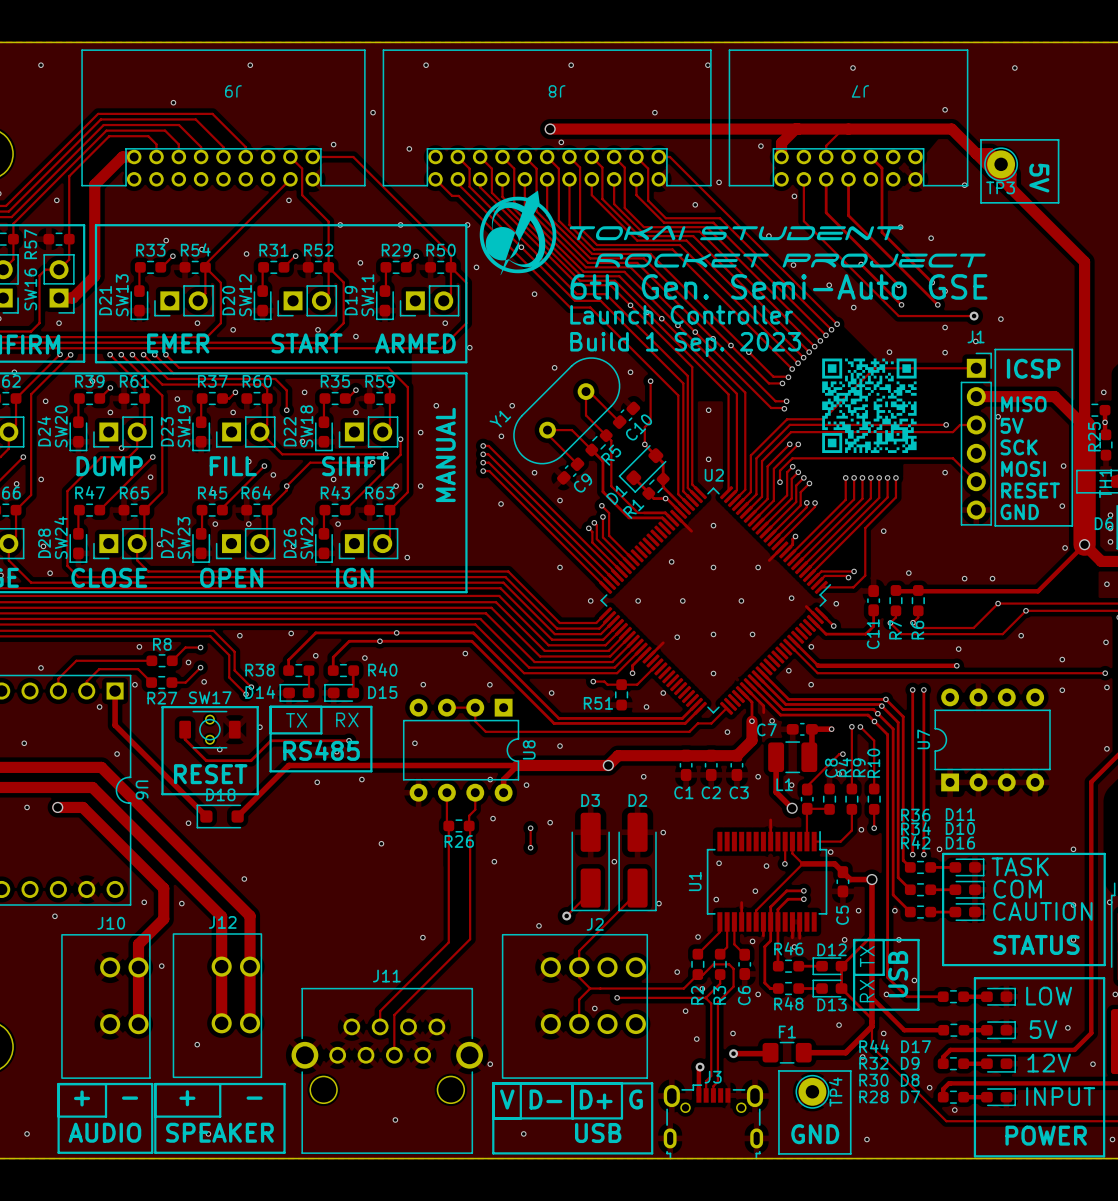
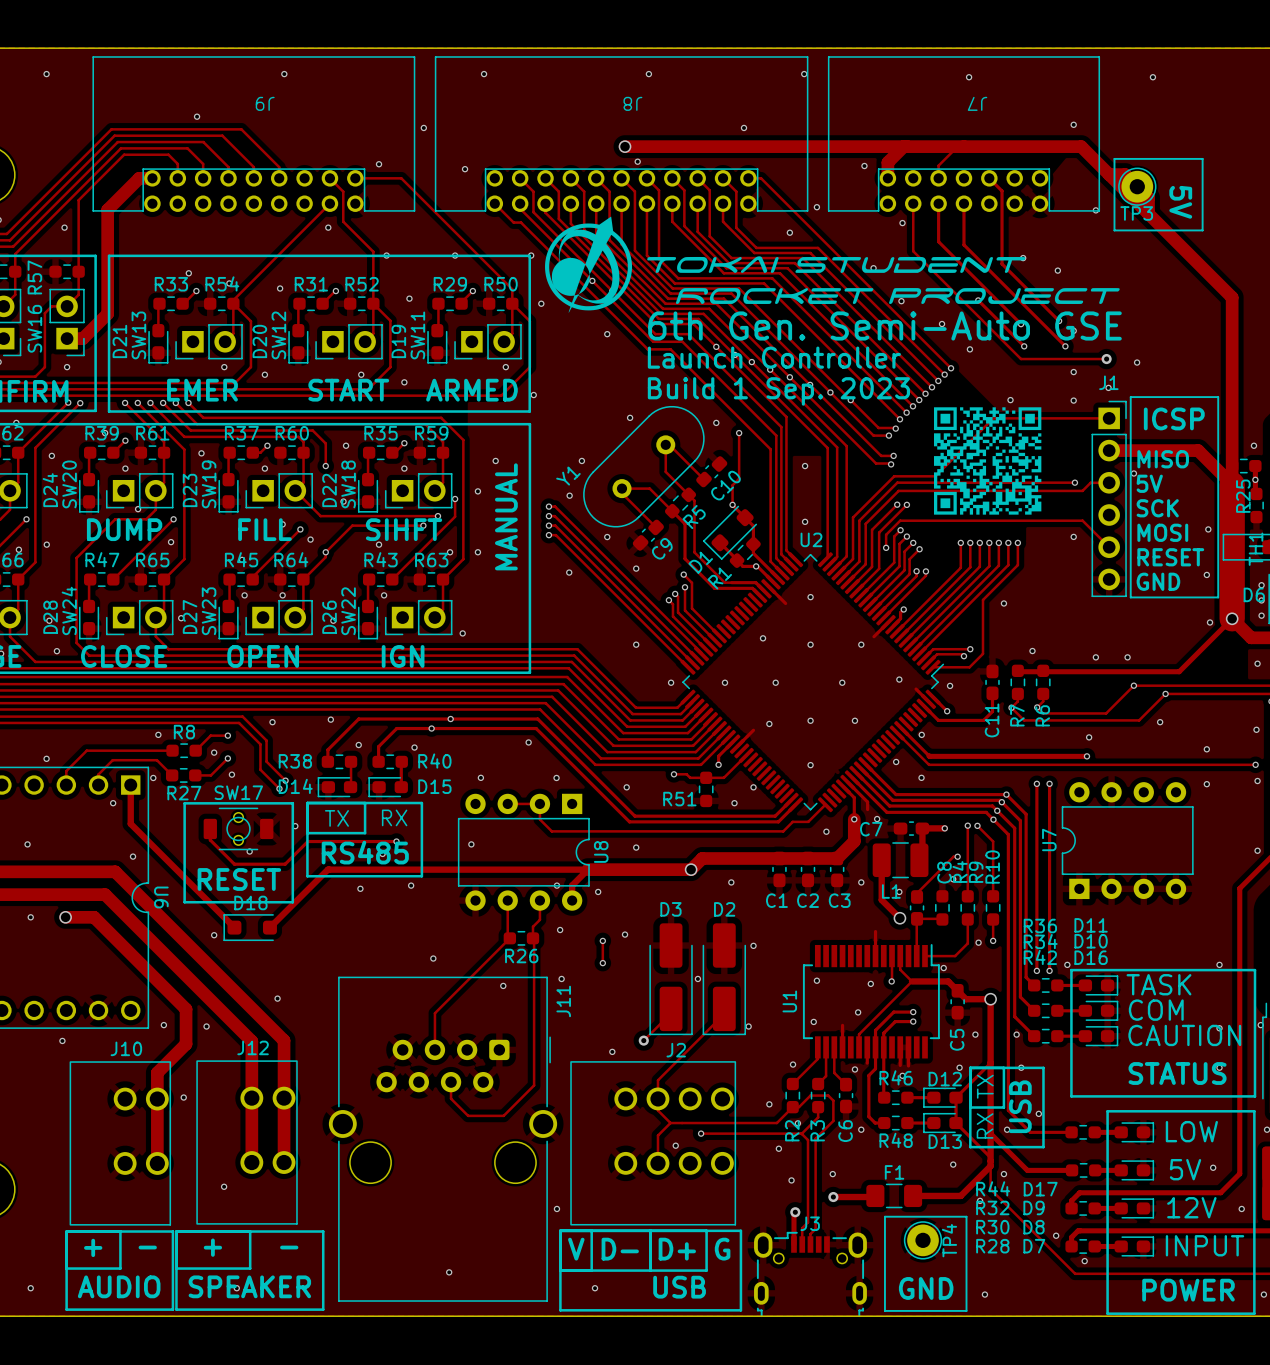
track: (448, 825) (448, 942) (380, 1011) (380, 1026) -> (509, 938) (434, 1013) (434, 1049)
via: none -> (503, 985)
via: (422, 937) -> none
track: (470, 939) (394, 1015) (394, 1055) -> (534, 1067) (534, 1085) (503, 1115) (468, 1115) (451, 1098) (451, 1082)
J11 name position: J11 (386, 976) -> J11 (563, 1001)
J11 footprint: [291, 987, 483, 1154] -> [328, 976, 558, 1302]

